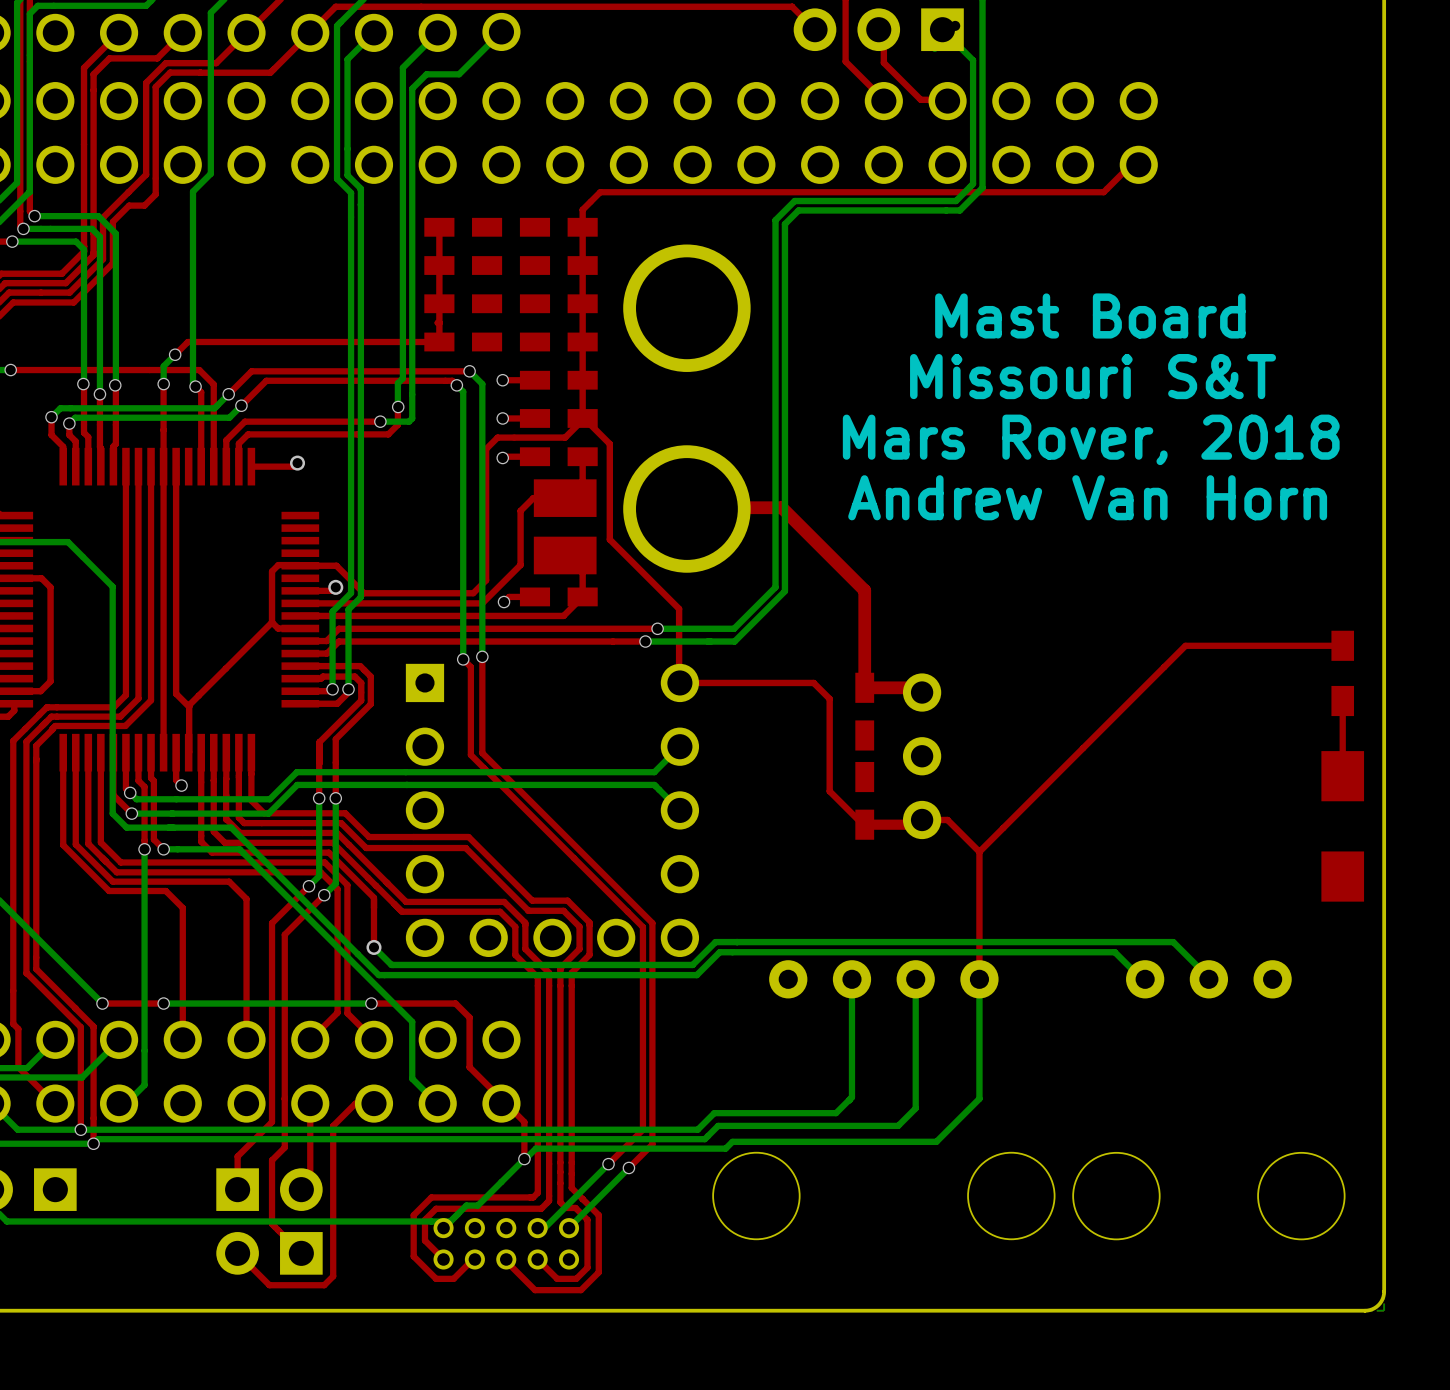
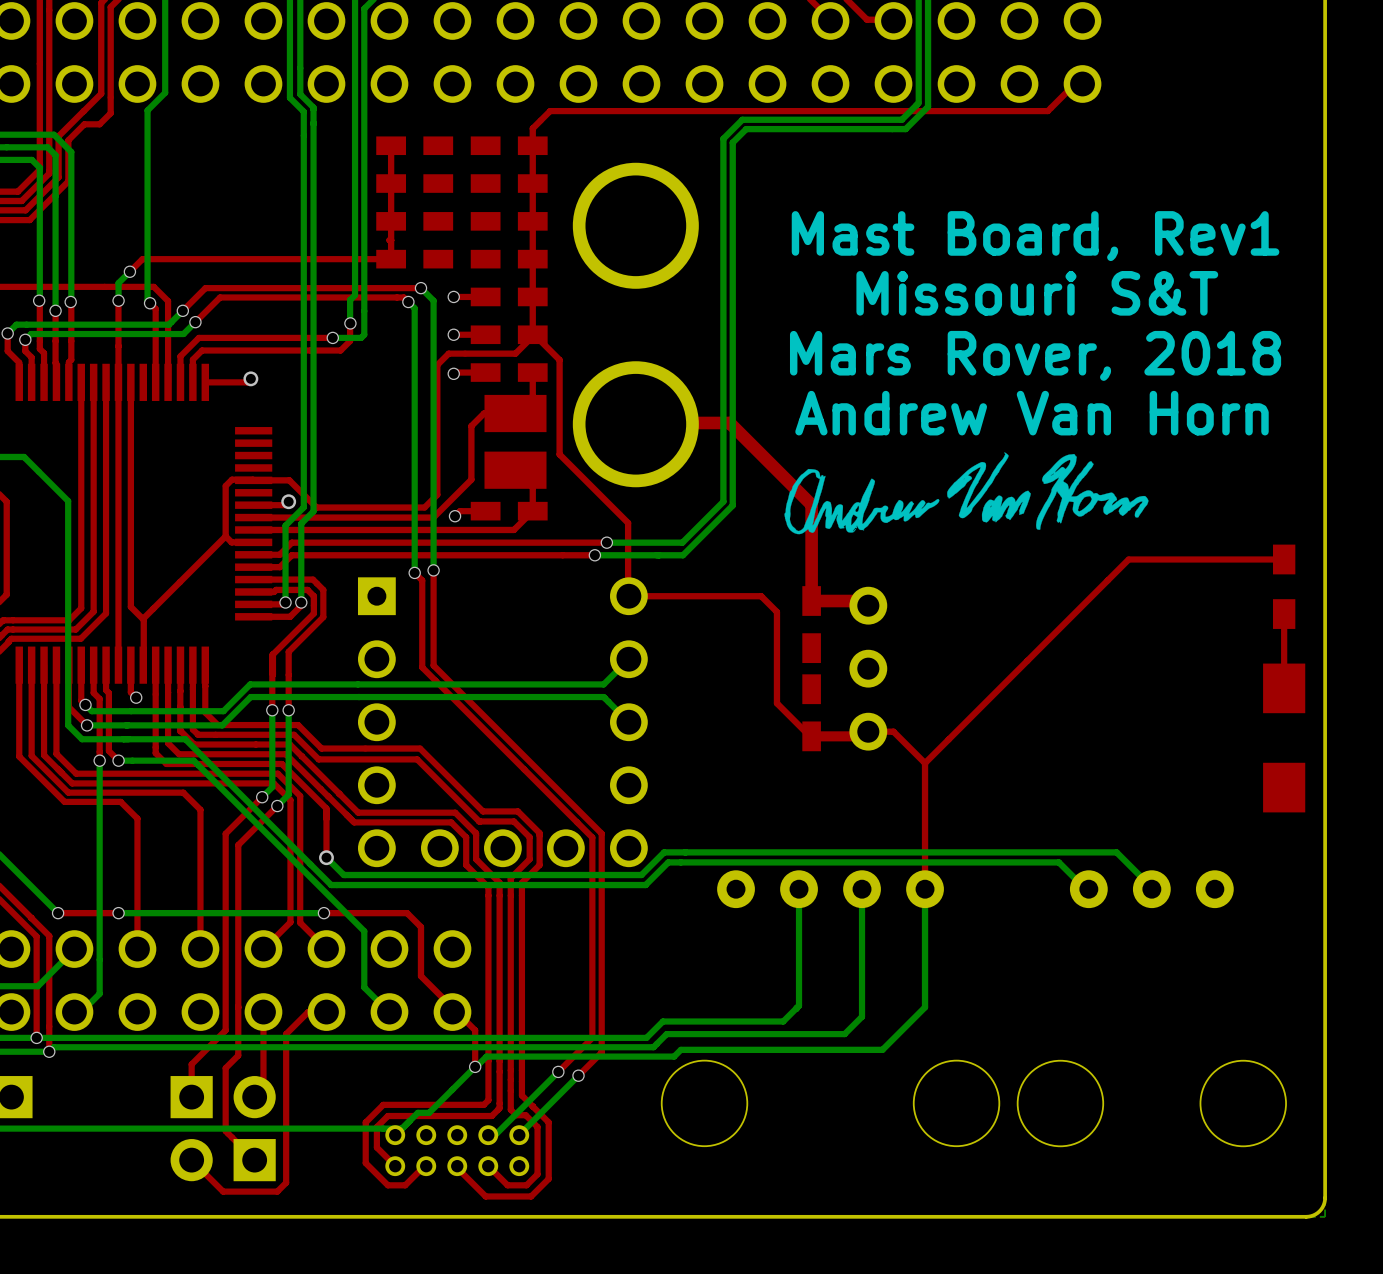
text: Mast Board (1090, 315) -> Mast Board, Rev1 (1035, 236)
drawing: none -> [784, 452, 1149, 535]

